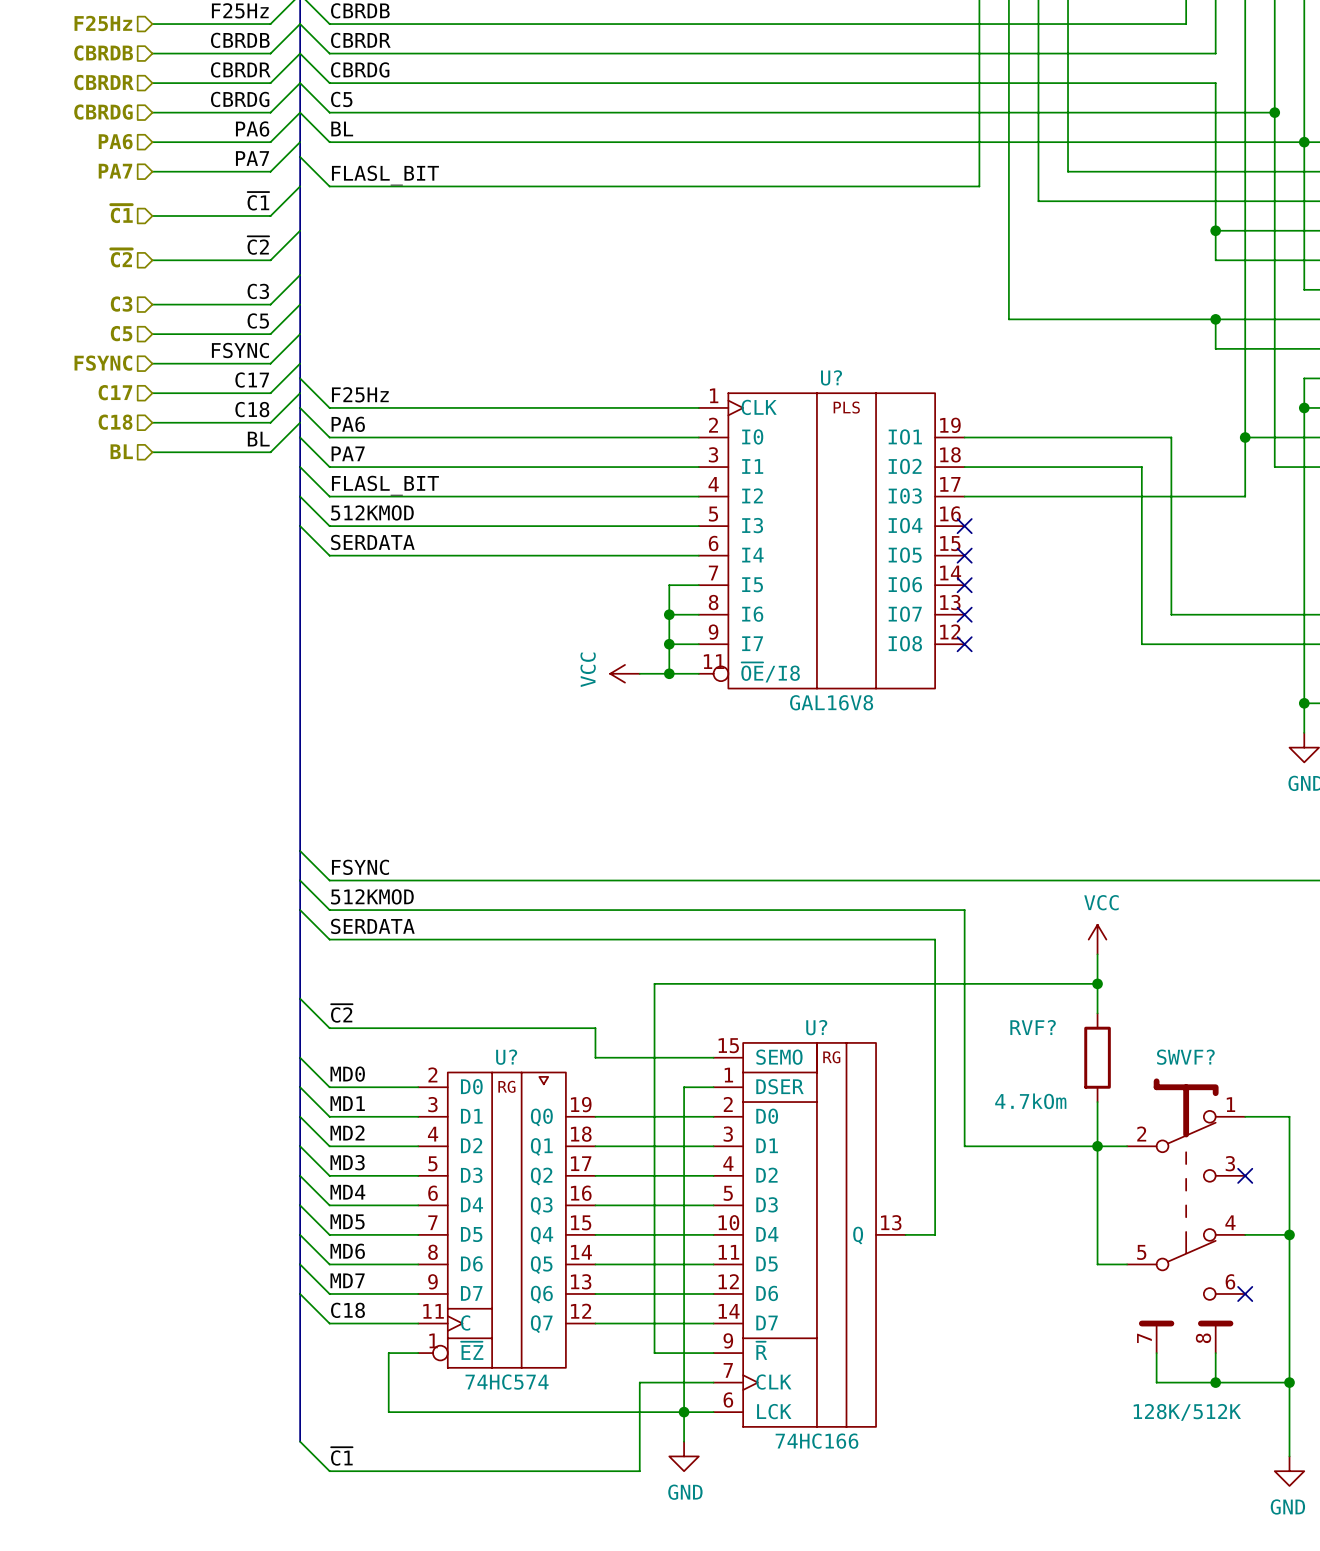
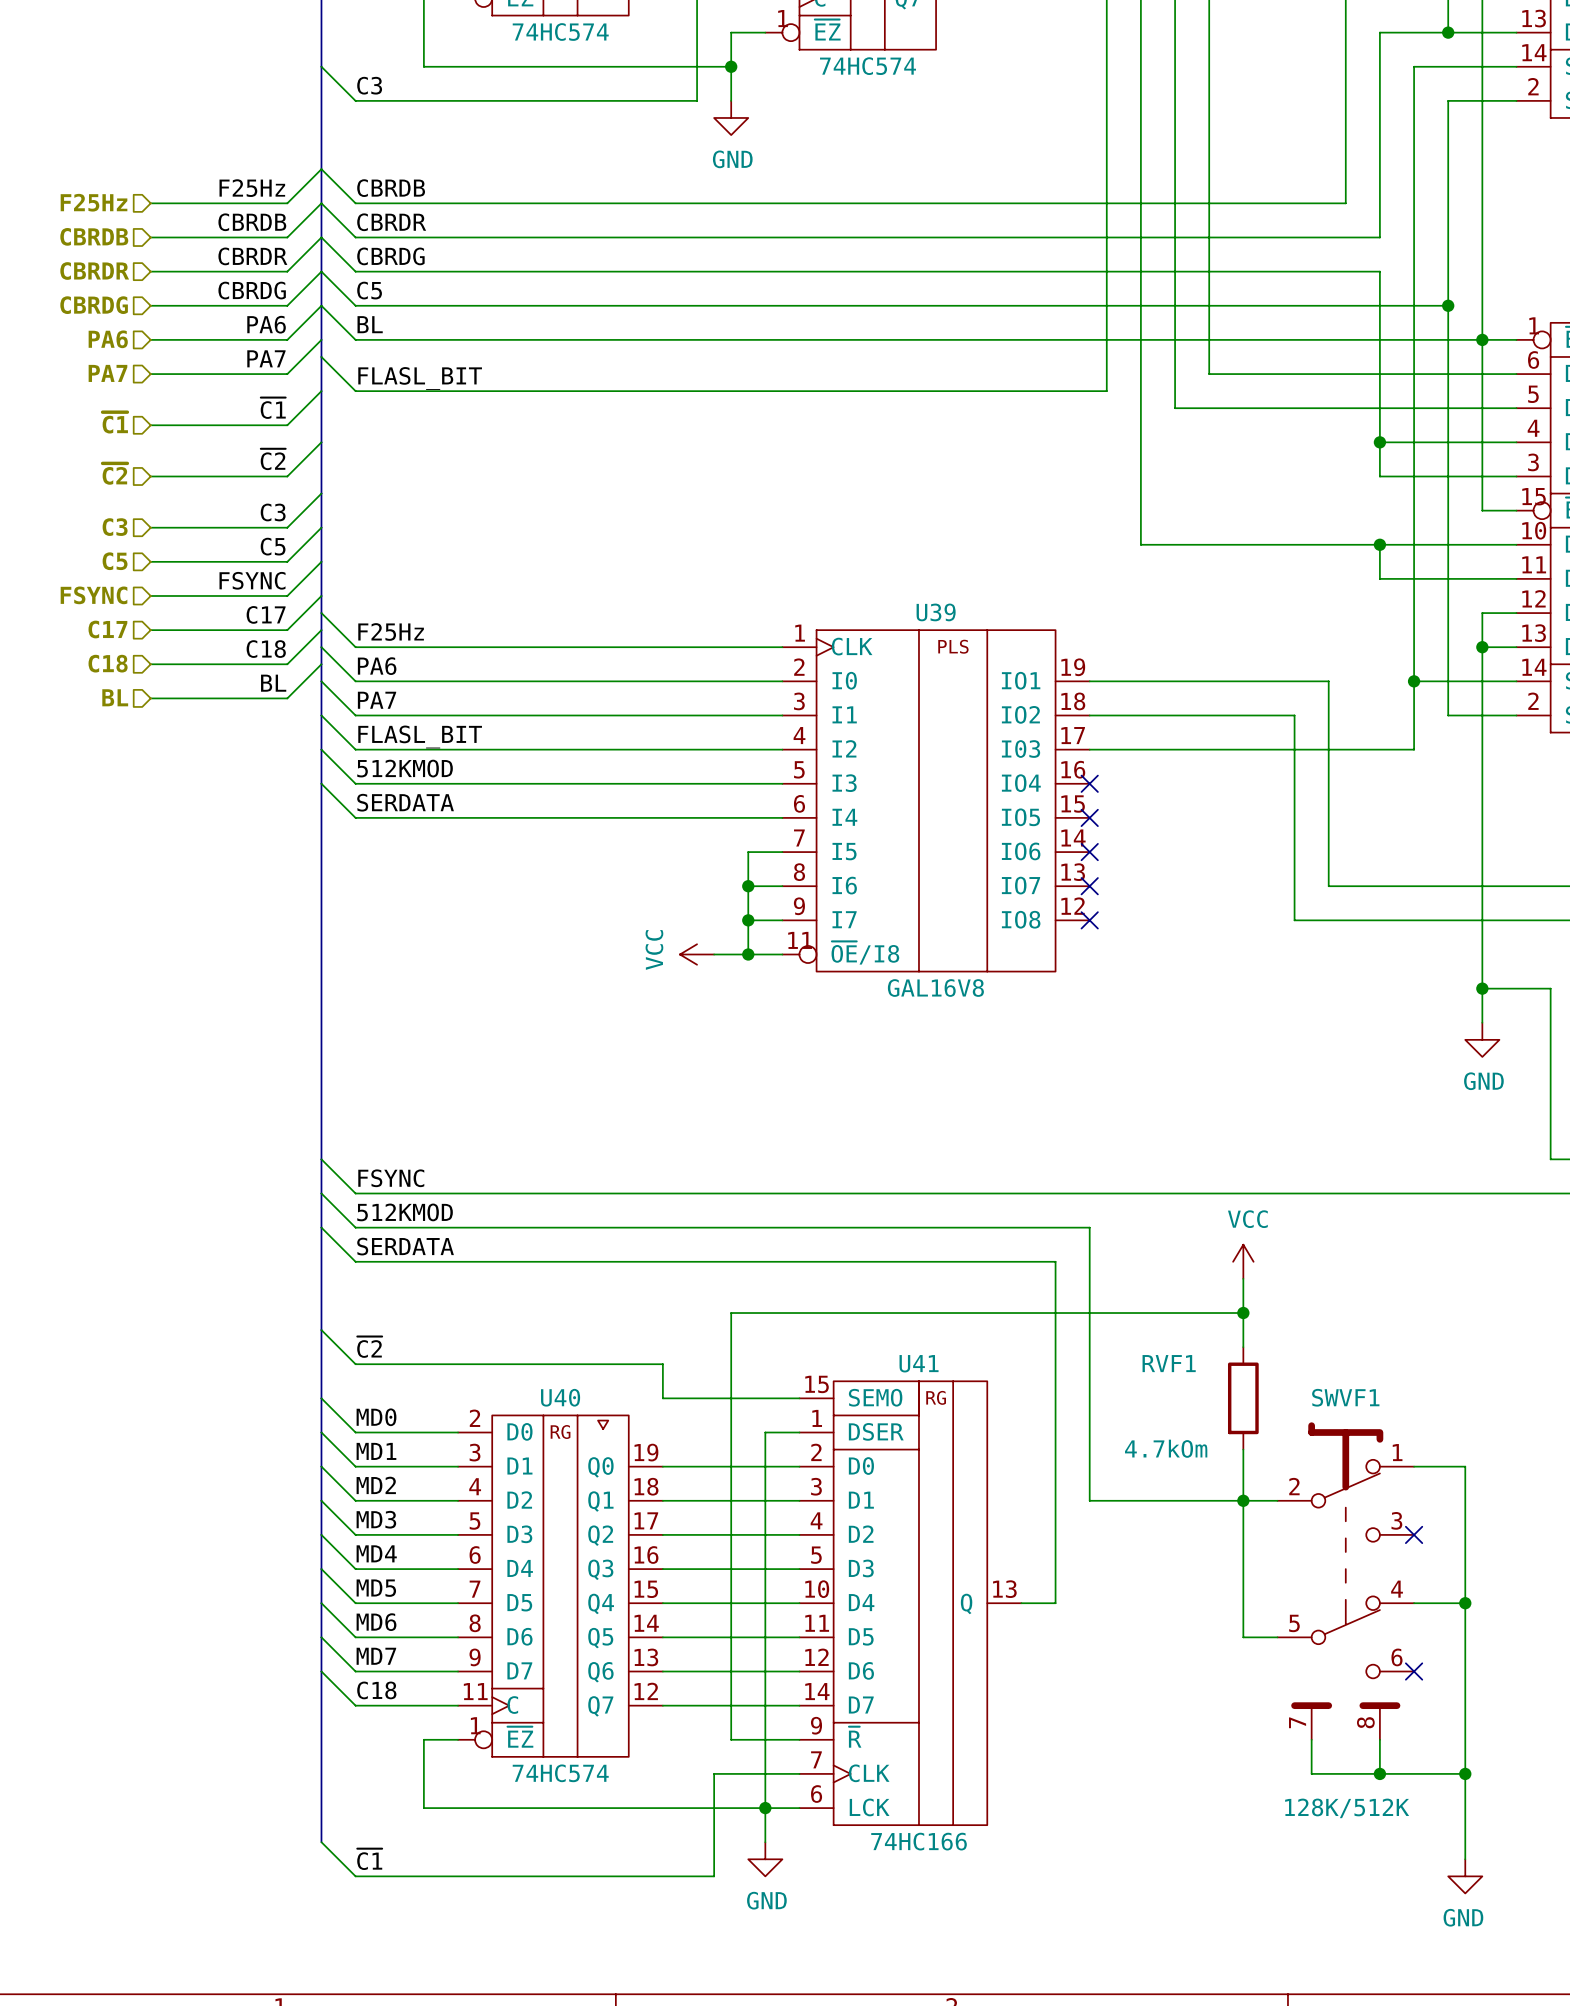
U? name: U? (831, 377) -> U39 (936, 612)
U? name: U? (816, 1027) -> U41 (919, 1363)
RVF? name: RVF? (1033, 1027) -> RVF1 (1169, 1363)
U? name: U? (506, 1057) -> U40 (560, 1397)
SWVF? name: SWVF? (1185, 1057) -> SWVF1 (1345, 1397)

